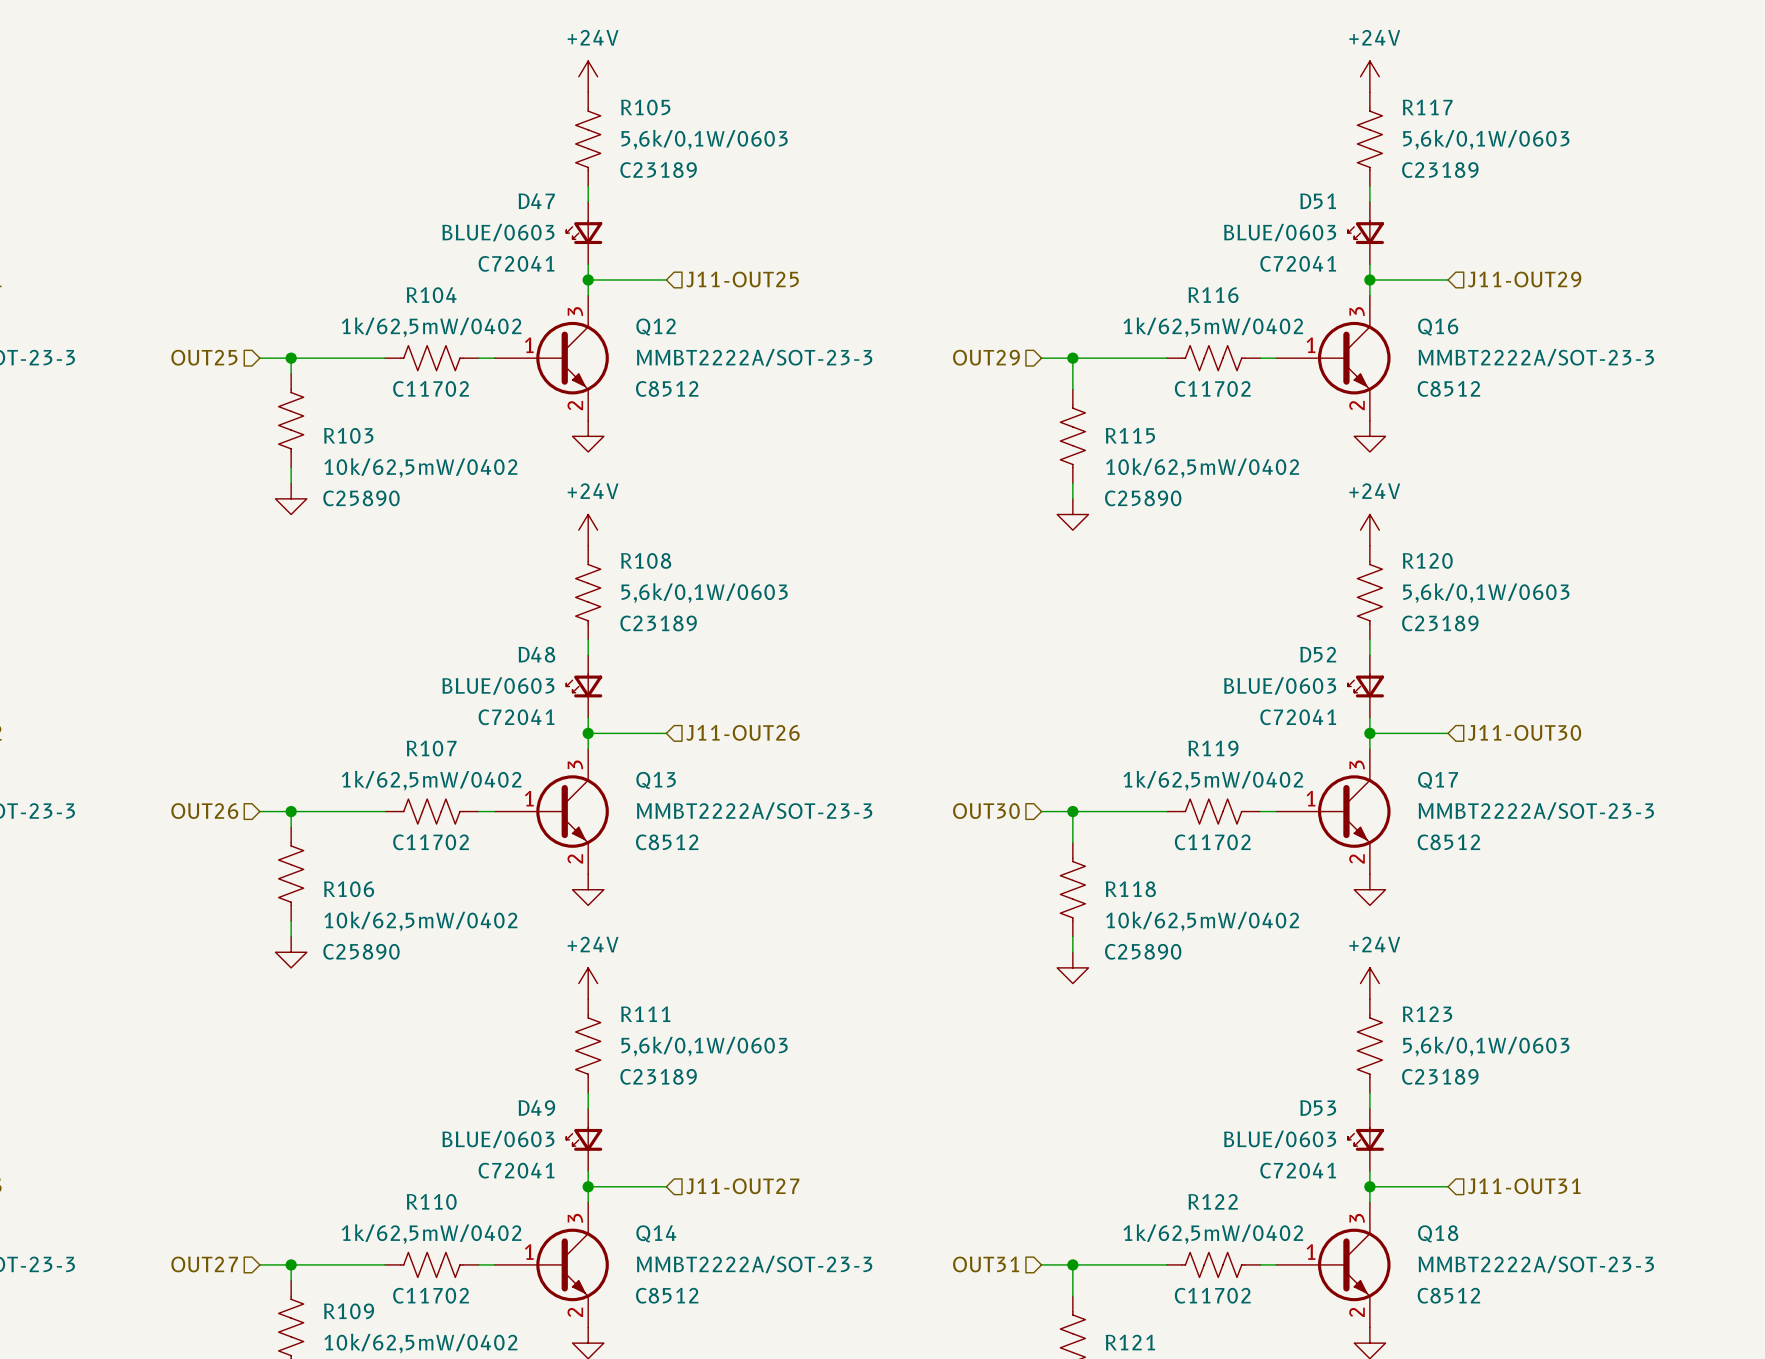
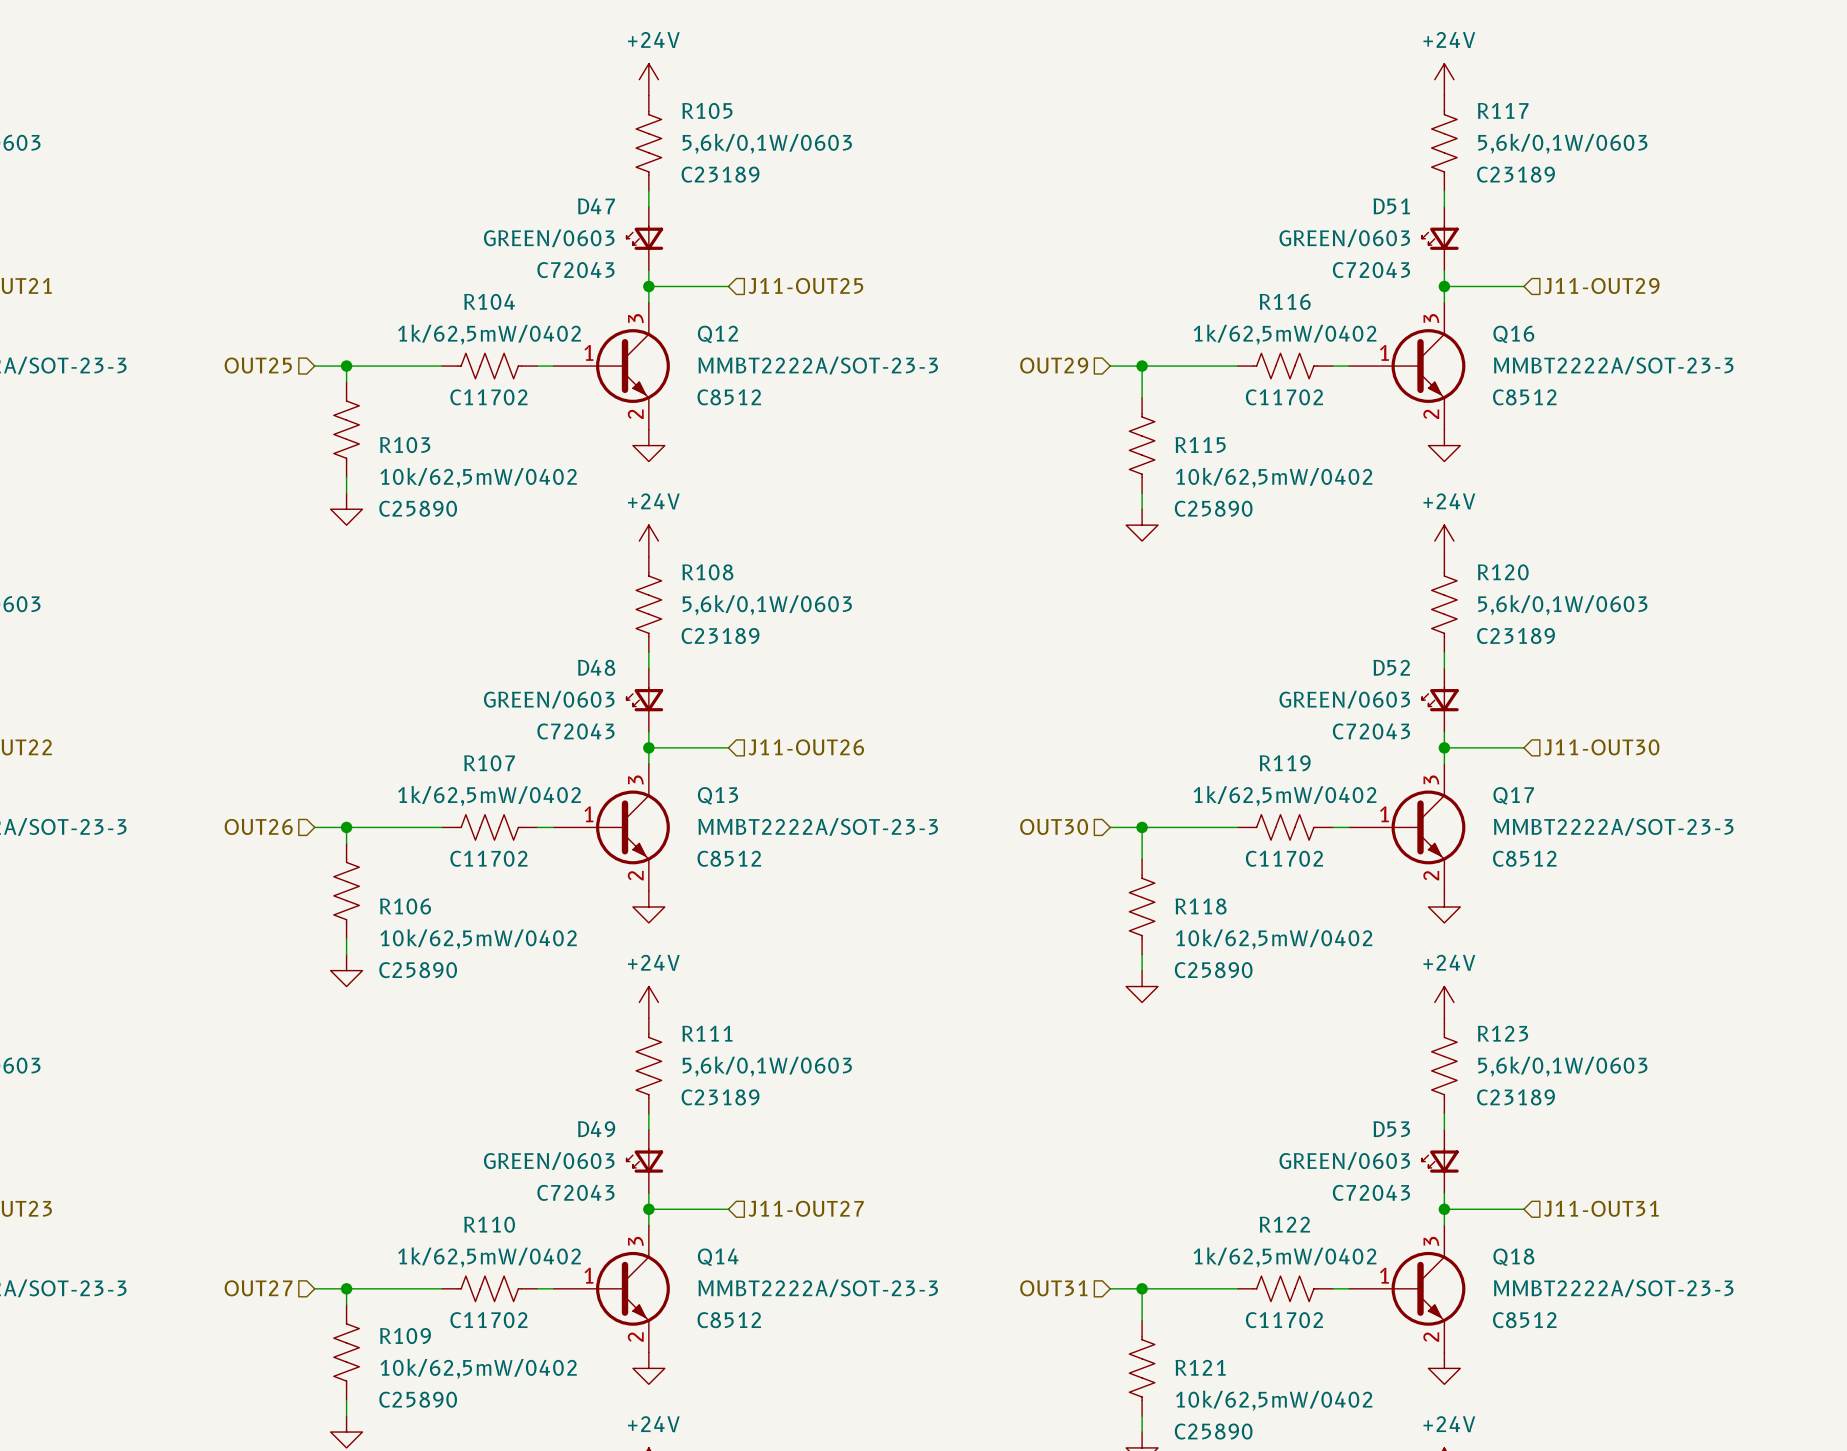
D47 value: BLUE/0603 (498, 232) -> GREEN/0603 (549, 238)
D51 value: BLUE/0603 (1280, 232) -> GREEN/0603 (1344, 238)
D47 text: C72041 (516, 263) -> C72043 (575, 270)
D51 text: C72041 (1298, 263) -> C72043 (1371, 270)
D48 value: BLUE/0603 (498, 686) -> GREEN/0603 (549, 699)
D52 value: BLUE/0603 (1280, 686) -> GREEN/0603 (1344, 699)
D48 text: C72041 (516, 717) -> C72043 (575, 731)
D52 text: C72041 (1298, 717) -> C72043 (1371, 731)
D49 value: BLUE/0603 (498, 1139) -> GREEN/0603 (549, 1161)
D53 value: BLUE/0603 (1280, 1139) -> GREEN/0603 (1344, 1161)
D49 text: C72041 (516, 1170) -> C72043 (575, 1192)
D53 text: C72041 (1298, 1170) -> C72043 (1371, 1192)

